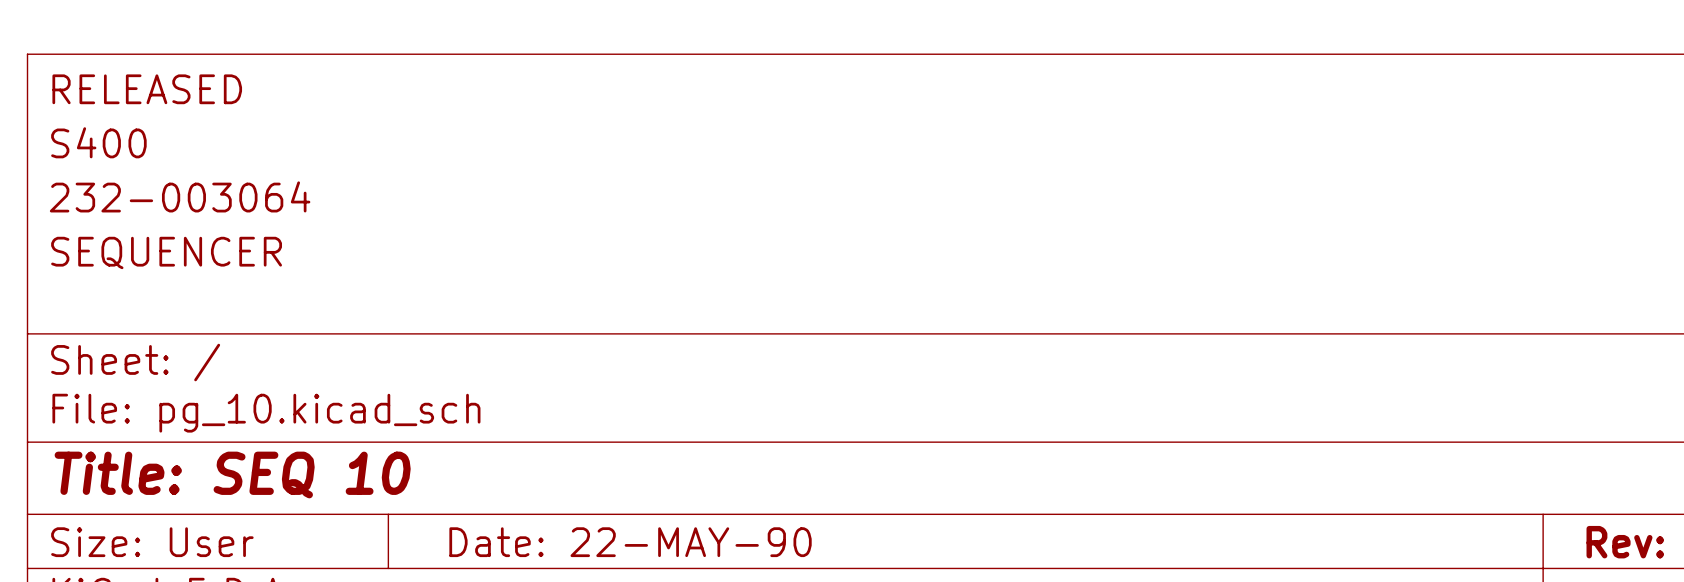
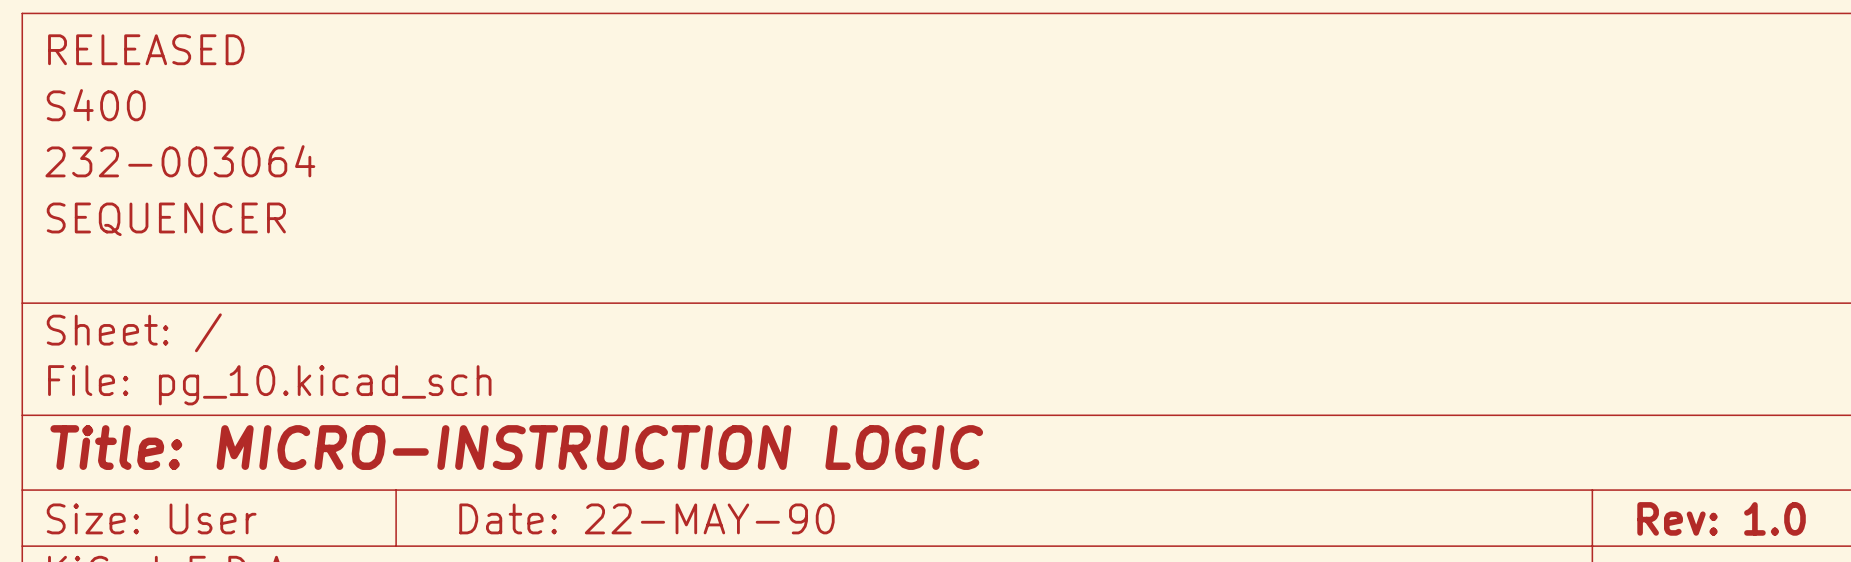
title block: Title: SEQ 10 (232, 474) -> Title: MICRO-INSTRUCTION LOGIC (516, 447)

